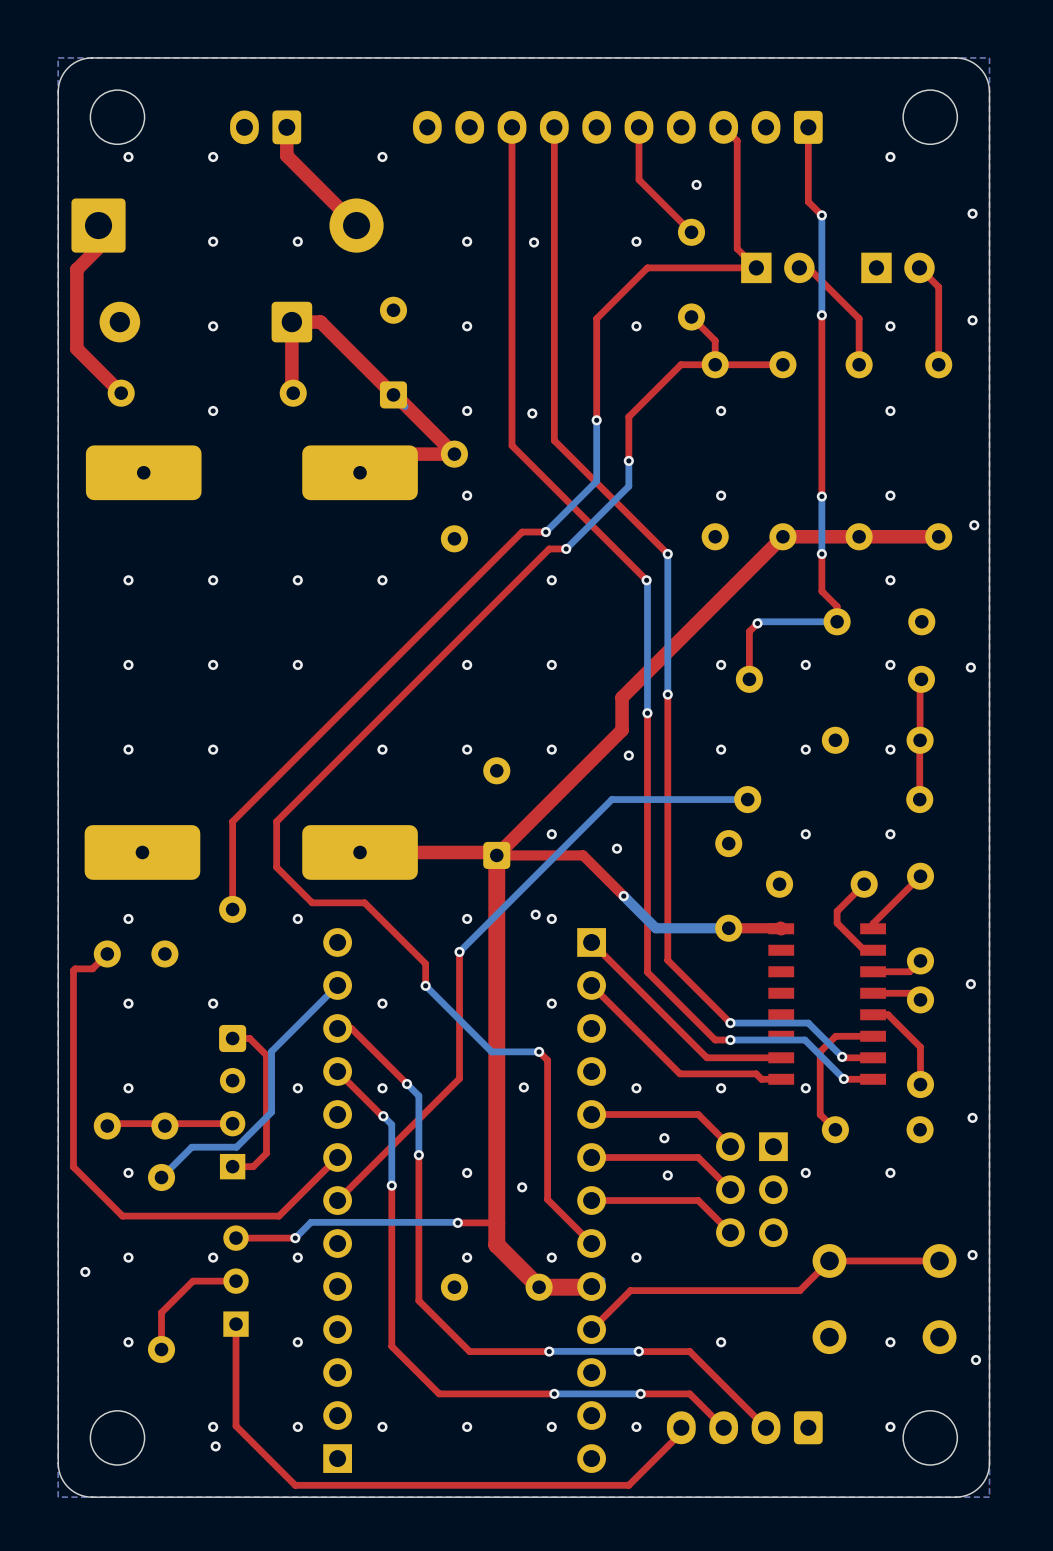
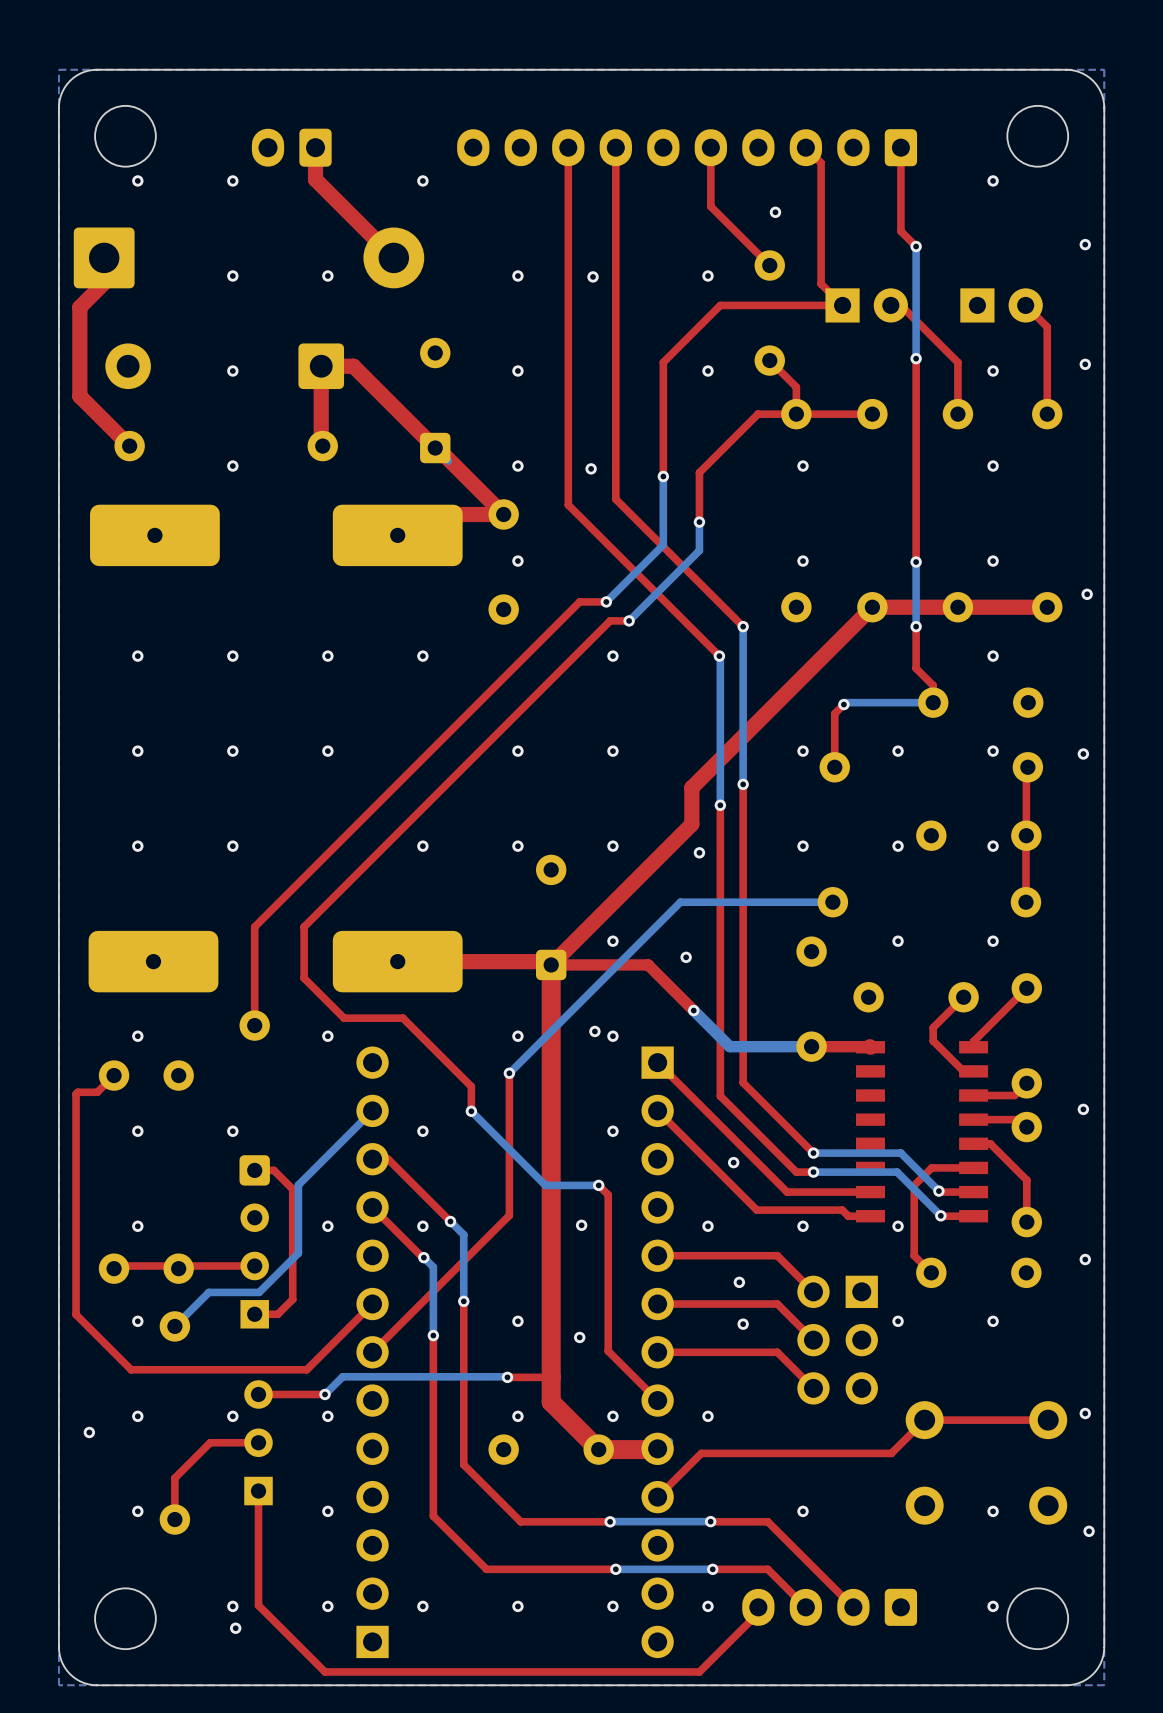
via: none -> (733, 1162)

